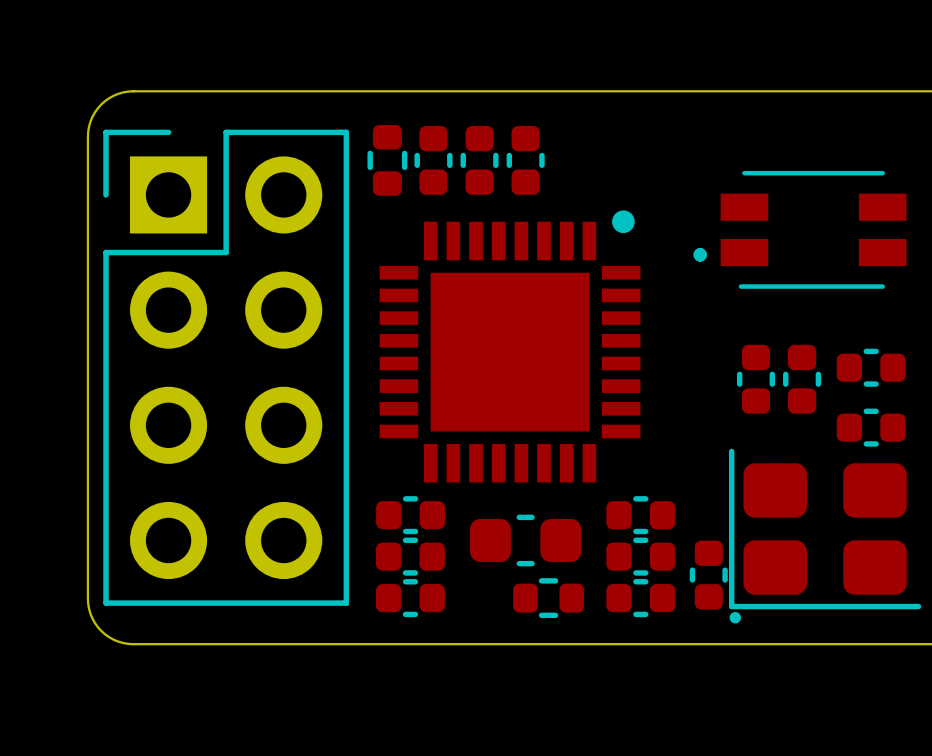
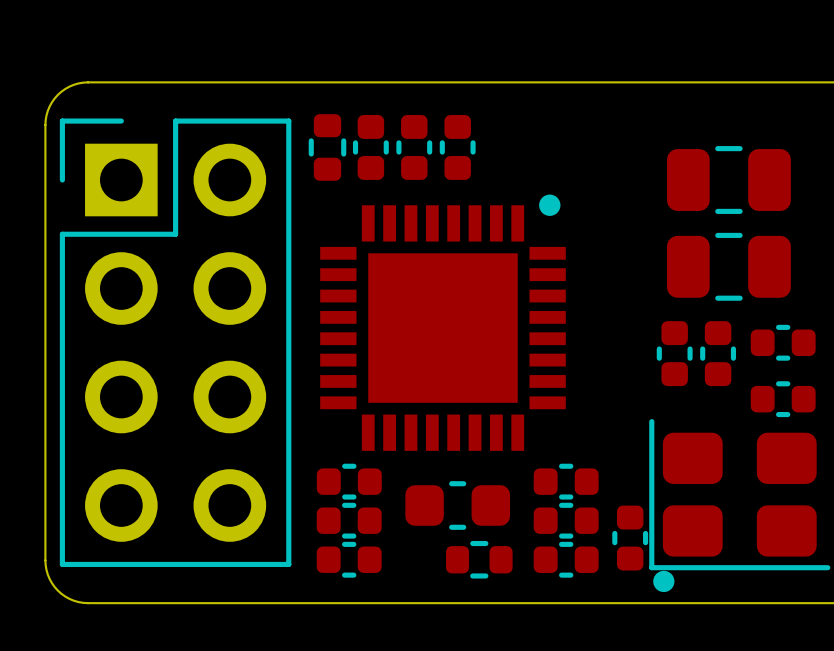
part: none -> (728, 180)
part: (799, 229) -> none
part: none -> (728, 266)
drawing shape: [729, 611, 741, 624] -> [653, 570, 675, 593]

